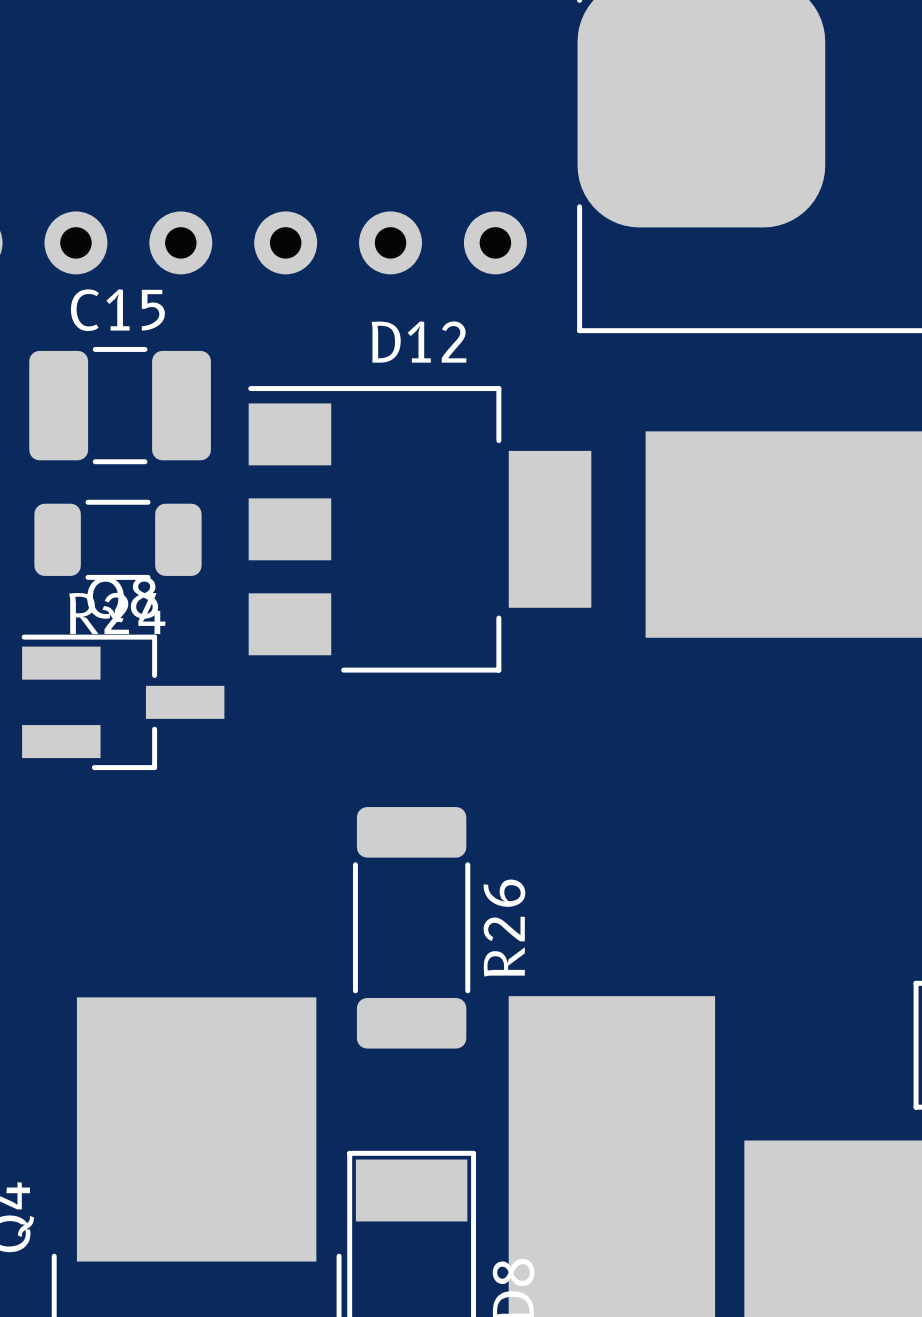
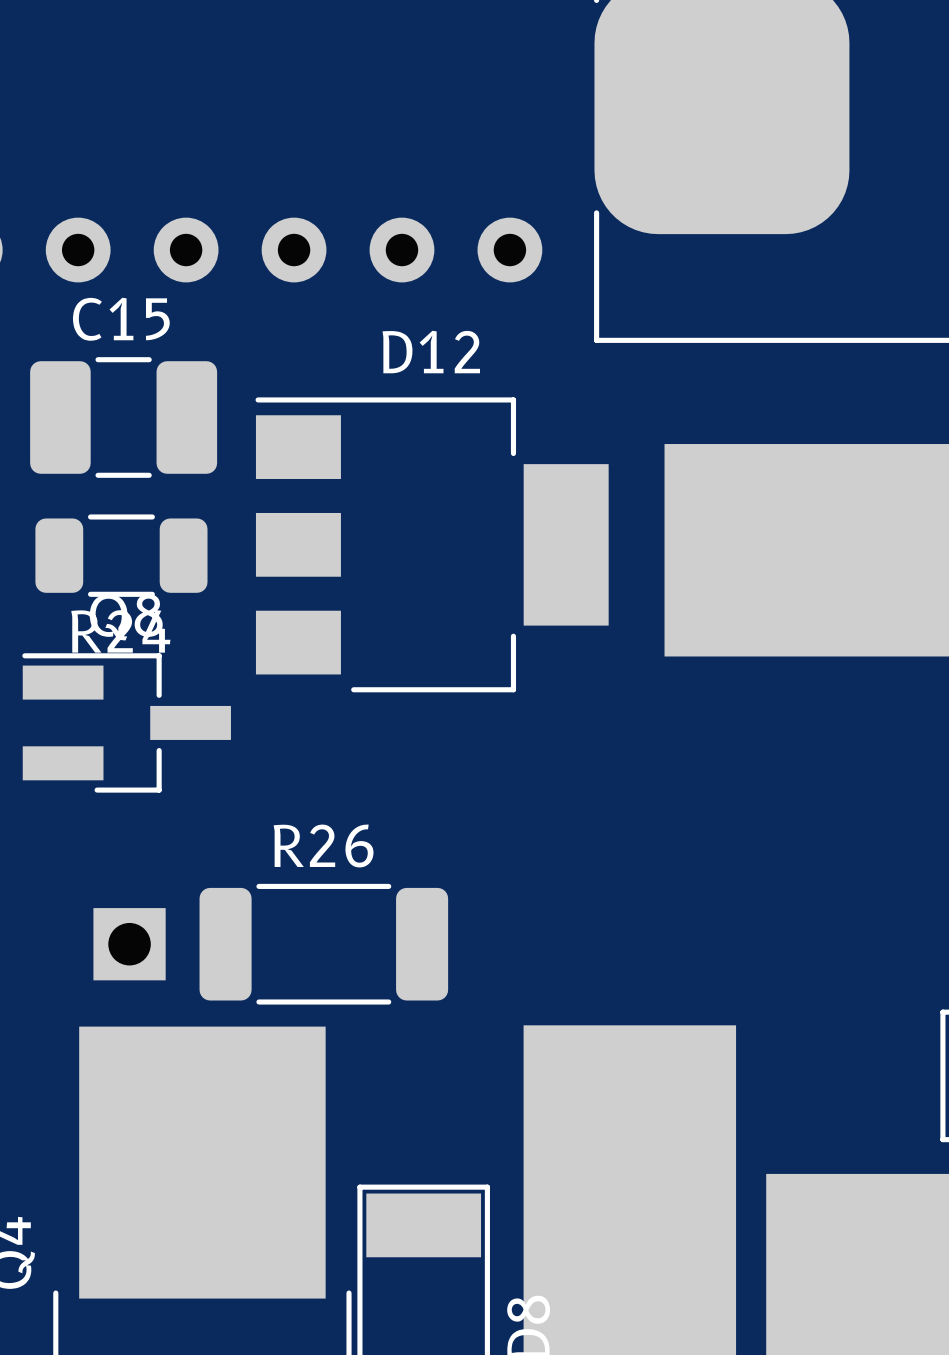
part: none -> (129, 944)
R26 rotation: 0° (411, 927) -> 90° clockwise (323, 944)
R26 name position: R26 (504, 928) -> R26 (323, 846)

